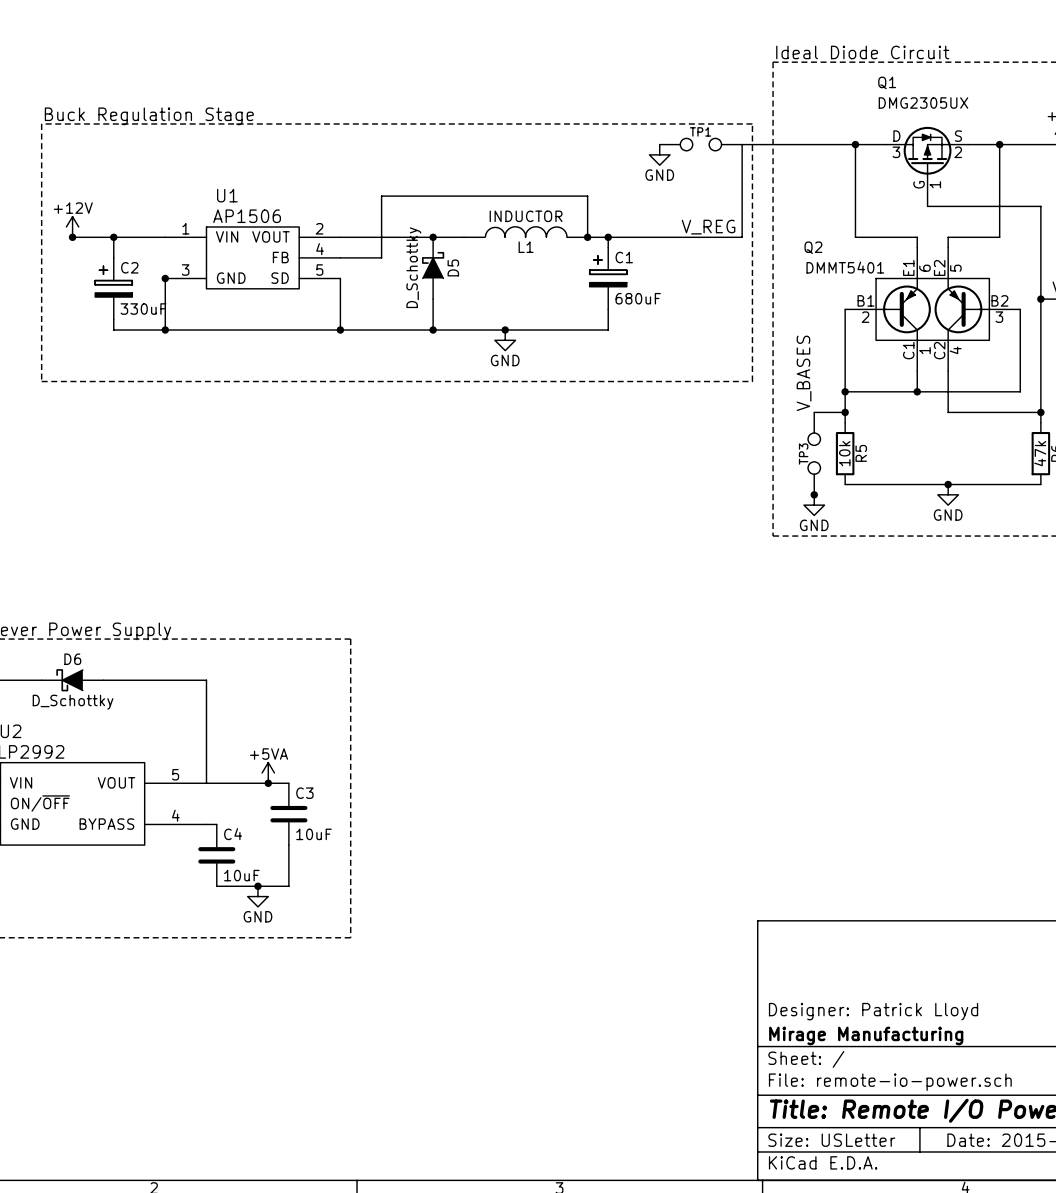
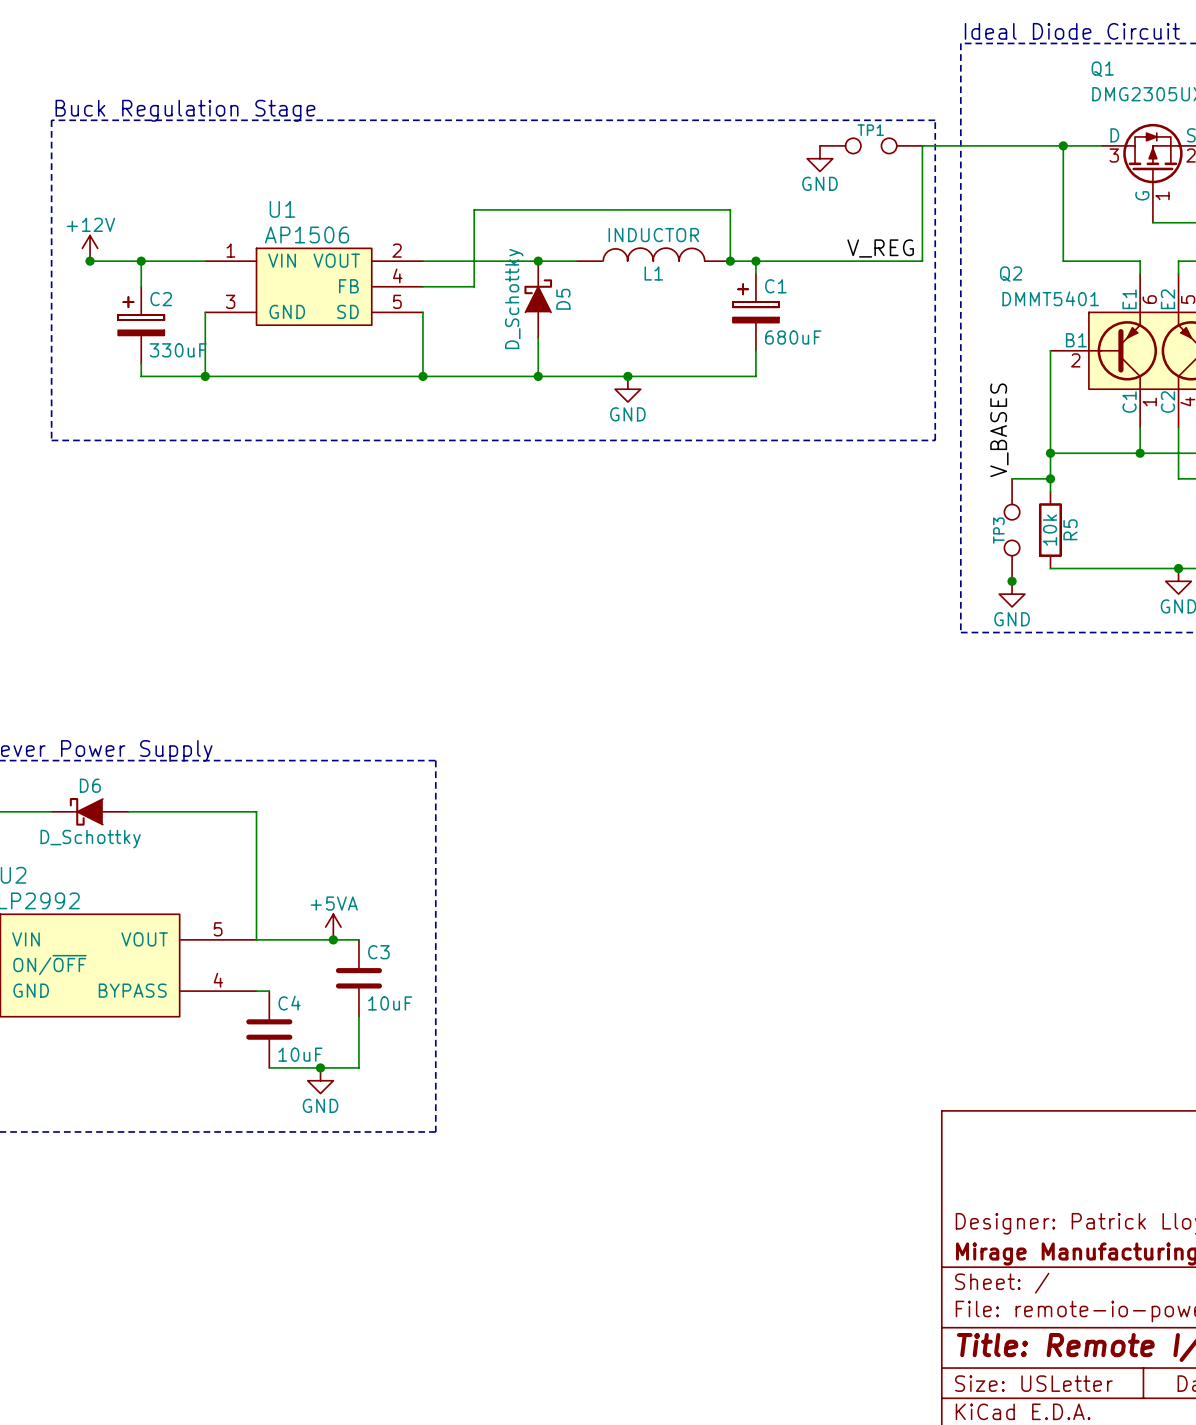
junction: (165, 278) -> none

